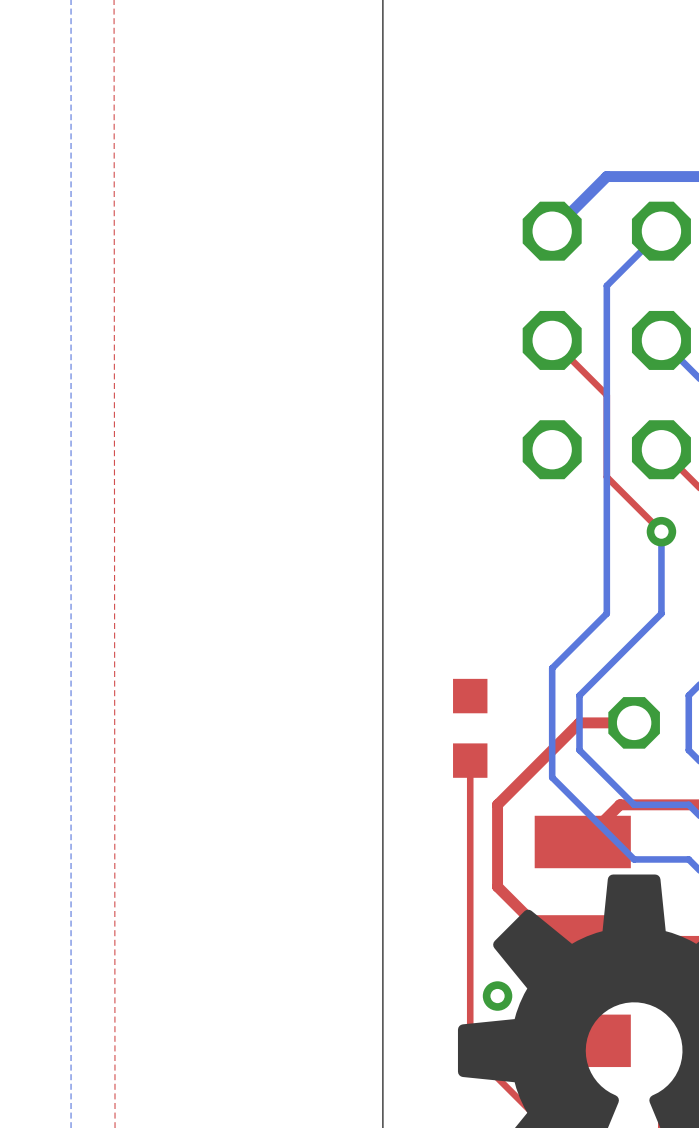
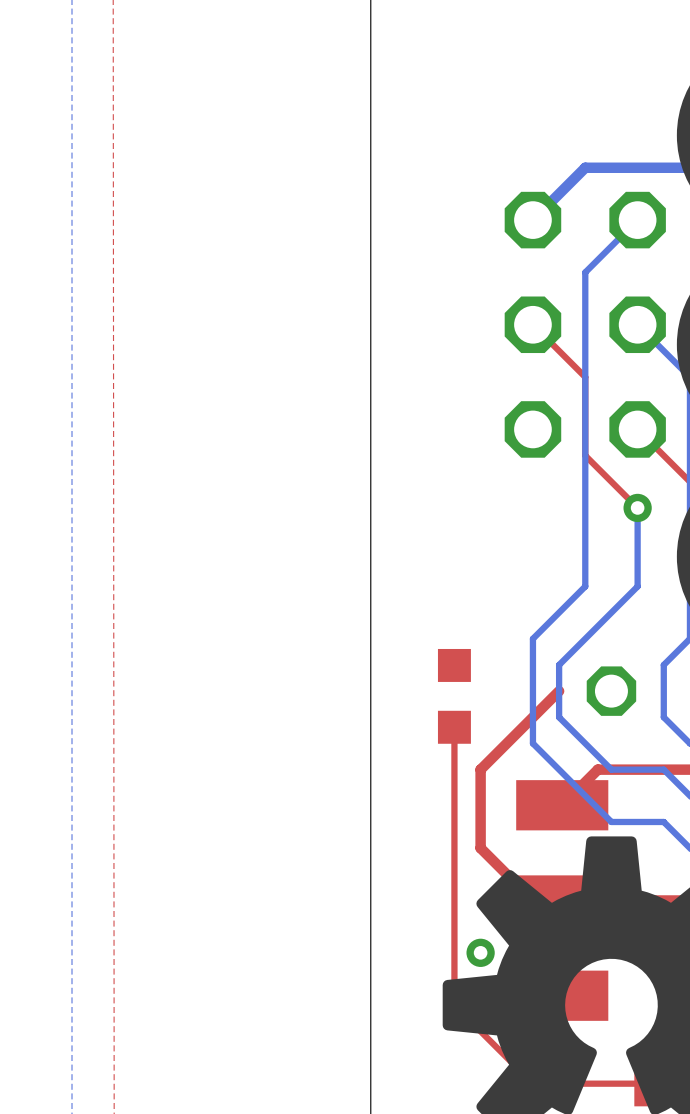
top track: (634, 722) (579, 722) -> none

